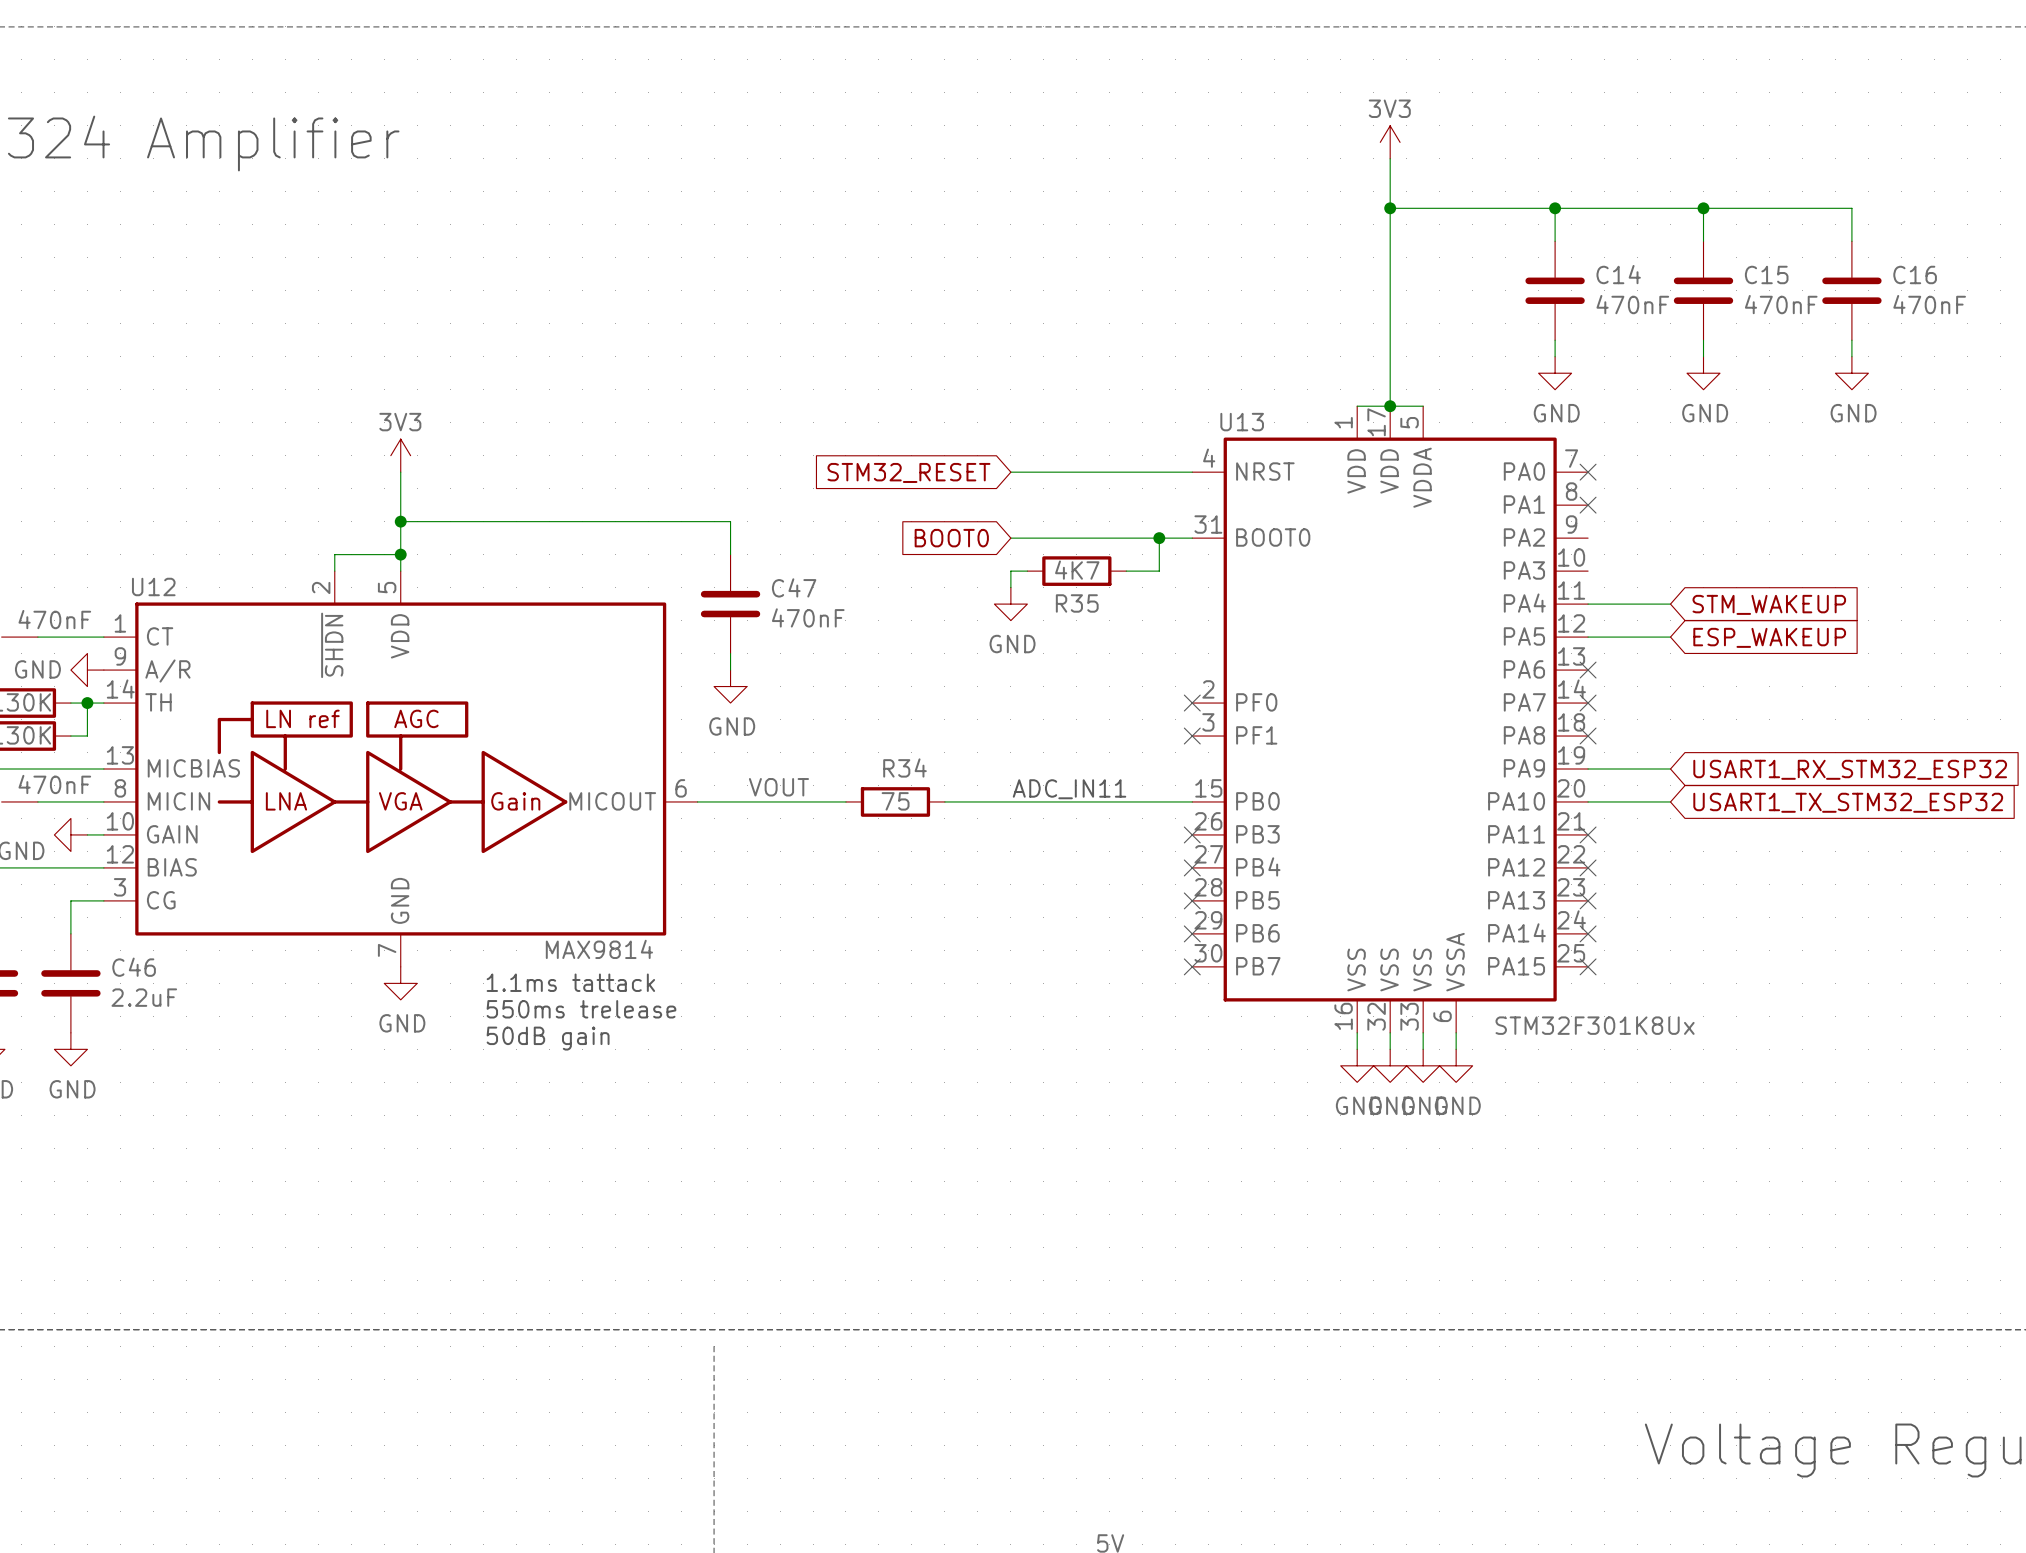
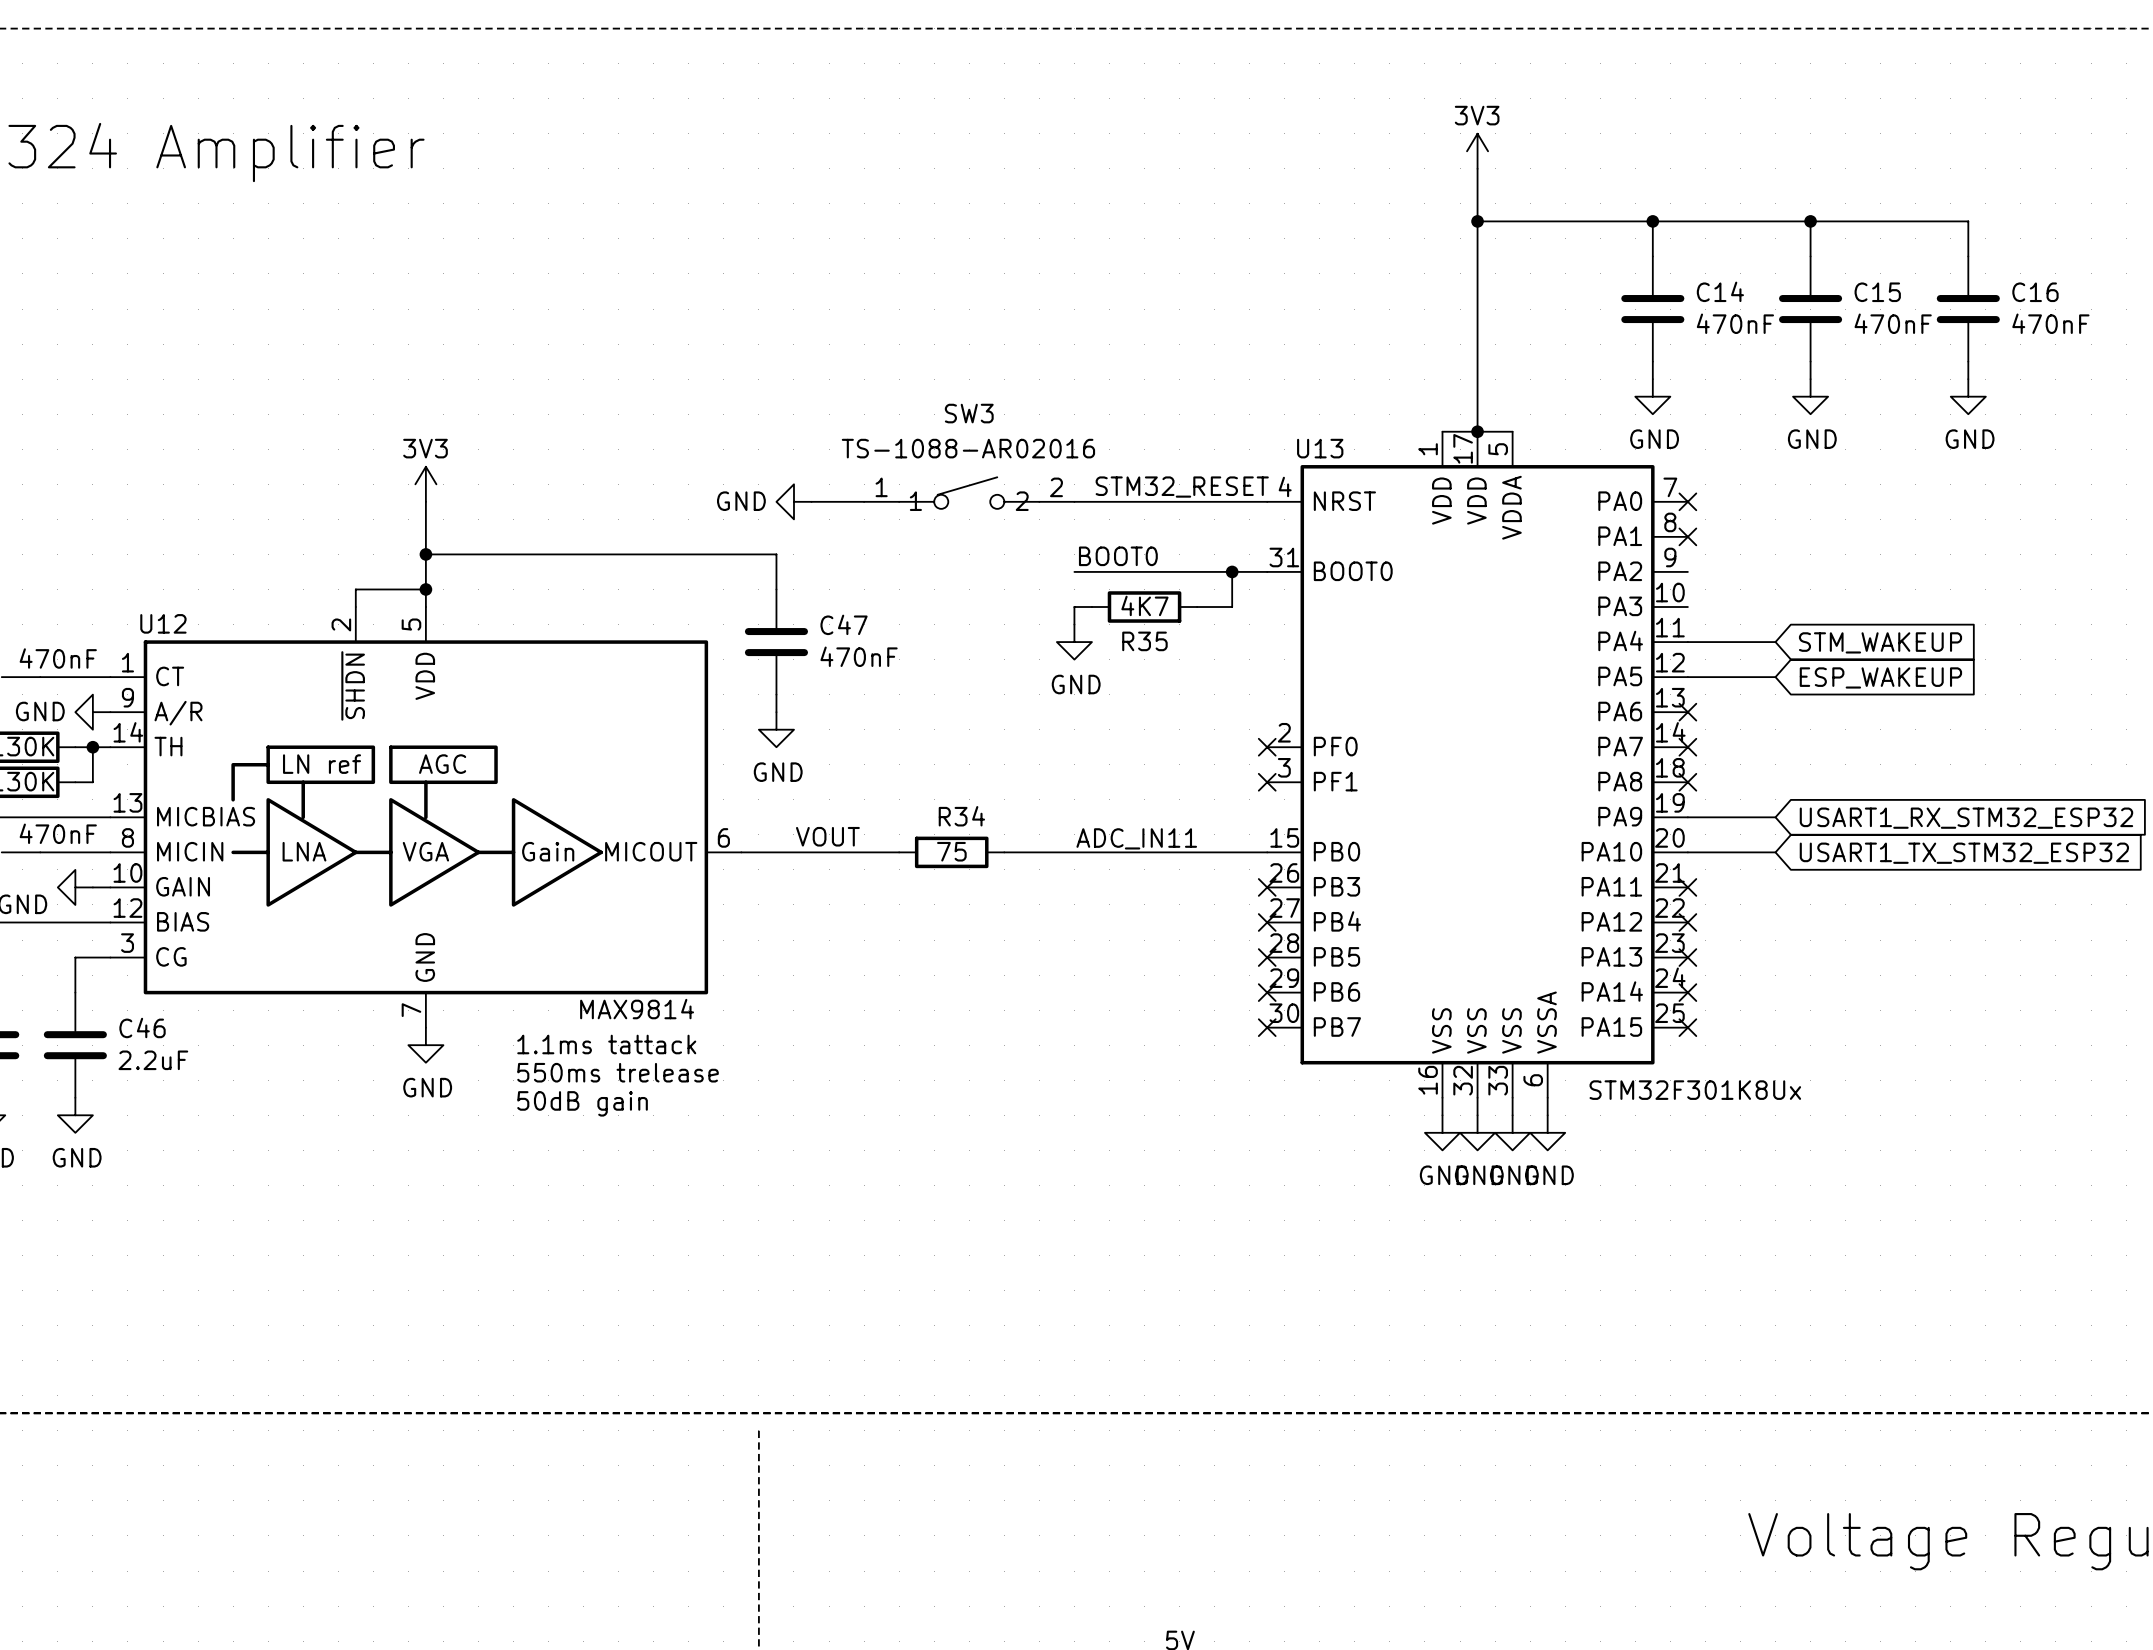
label: none -> STM32_RESET (1182, 487)
SW3: none -> TS-1088-AR02016 (969, 493)
power symbol: none -> GND (793, 501)
wire: none -> (811, 501) (864, 501)
global label: STM32_RESET (908, 472) -> none
label: none -> BOOT0 (1118, 556)
global label: BOOT0 (951, 538) -> none

